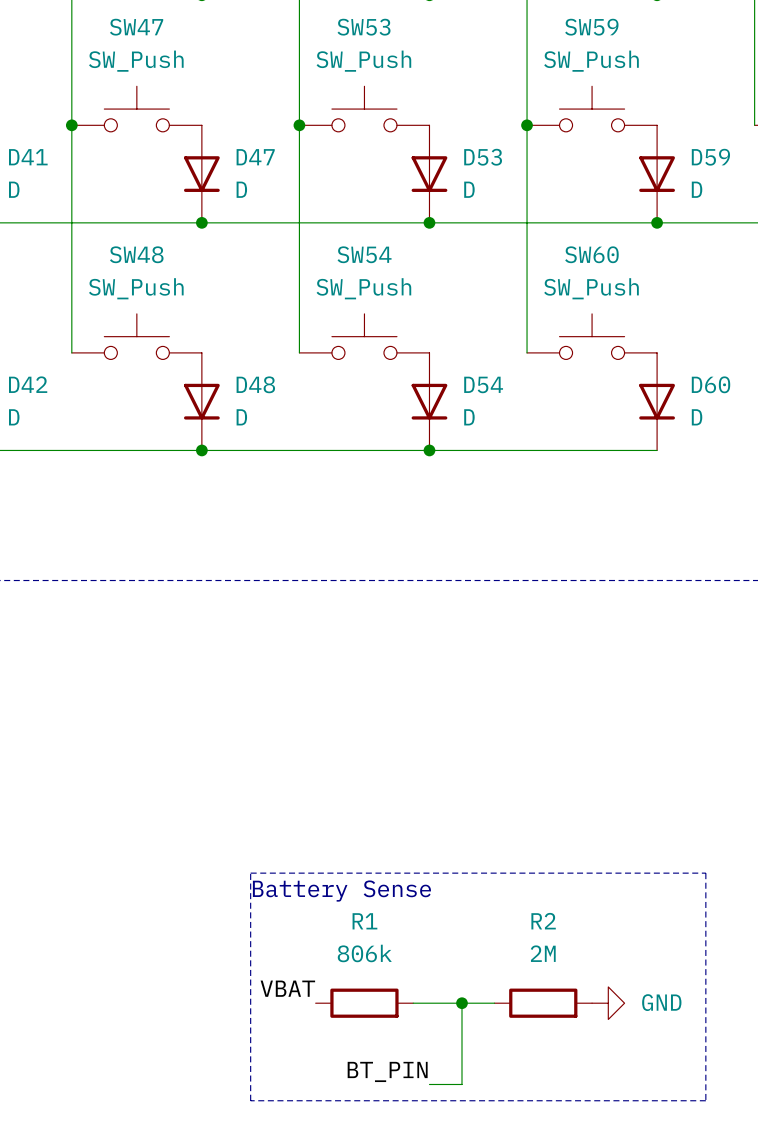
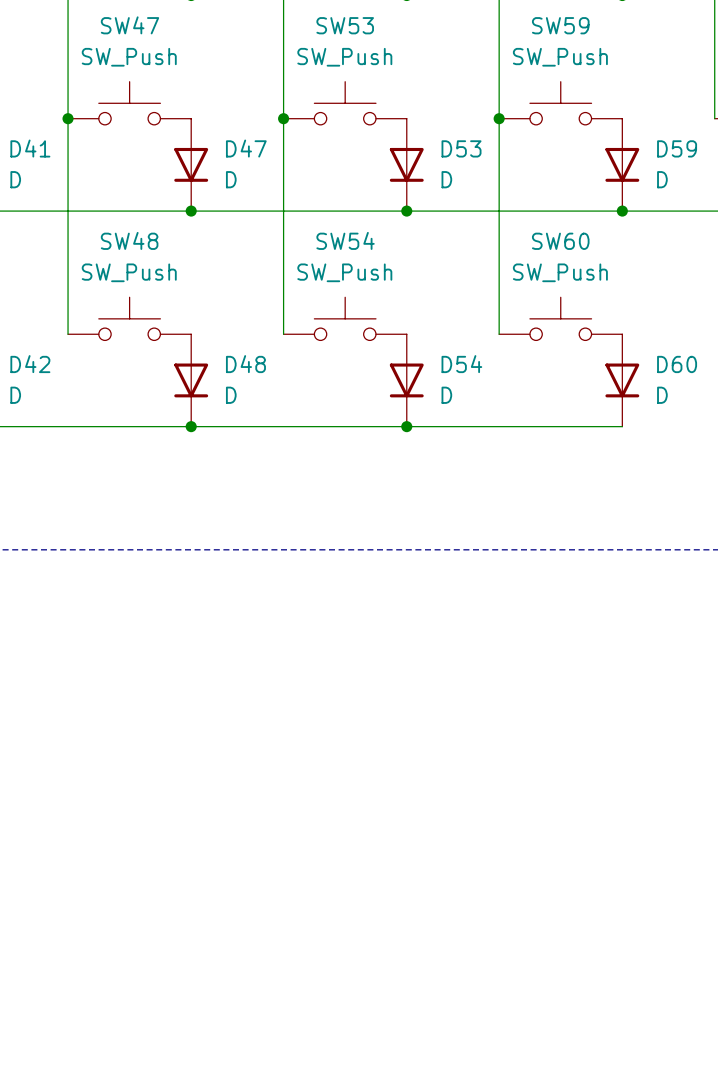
line: (250, 873) (705, 873) (705, 1100) (250, 1100) (250, 873) -> none
text: Battery Sense (341, 891) -> none
label: VBAT (287, 988) -> none
R1: 806k (364, 1003) -> none
wire: (413, 1003) (494, 1003) -> none
wire: (461, 1003) (461, 1084) (429, 1084) -> none
junction: (461, 1003) -> none
R2: 2M (543, 1003) -> none
power symbol: GND (608, 1003) -> none
label: BT_PIN (387, 1071) -> none

